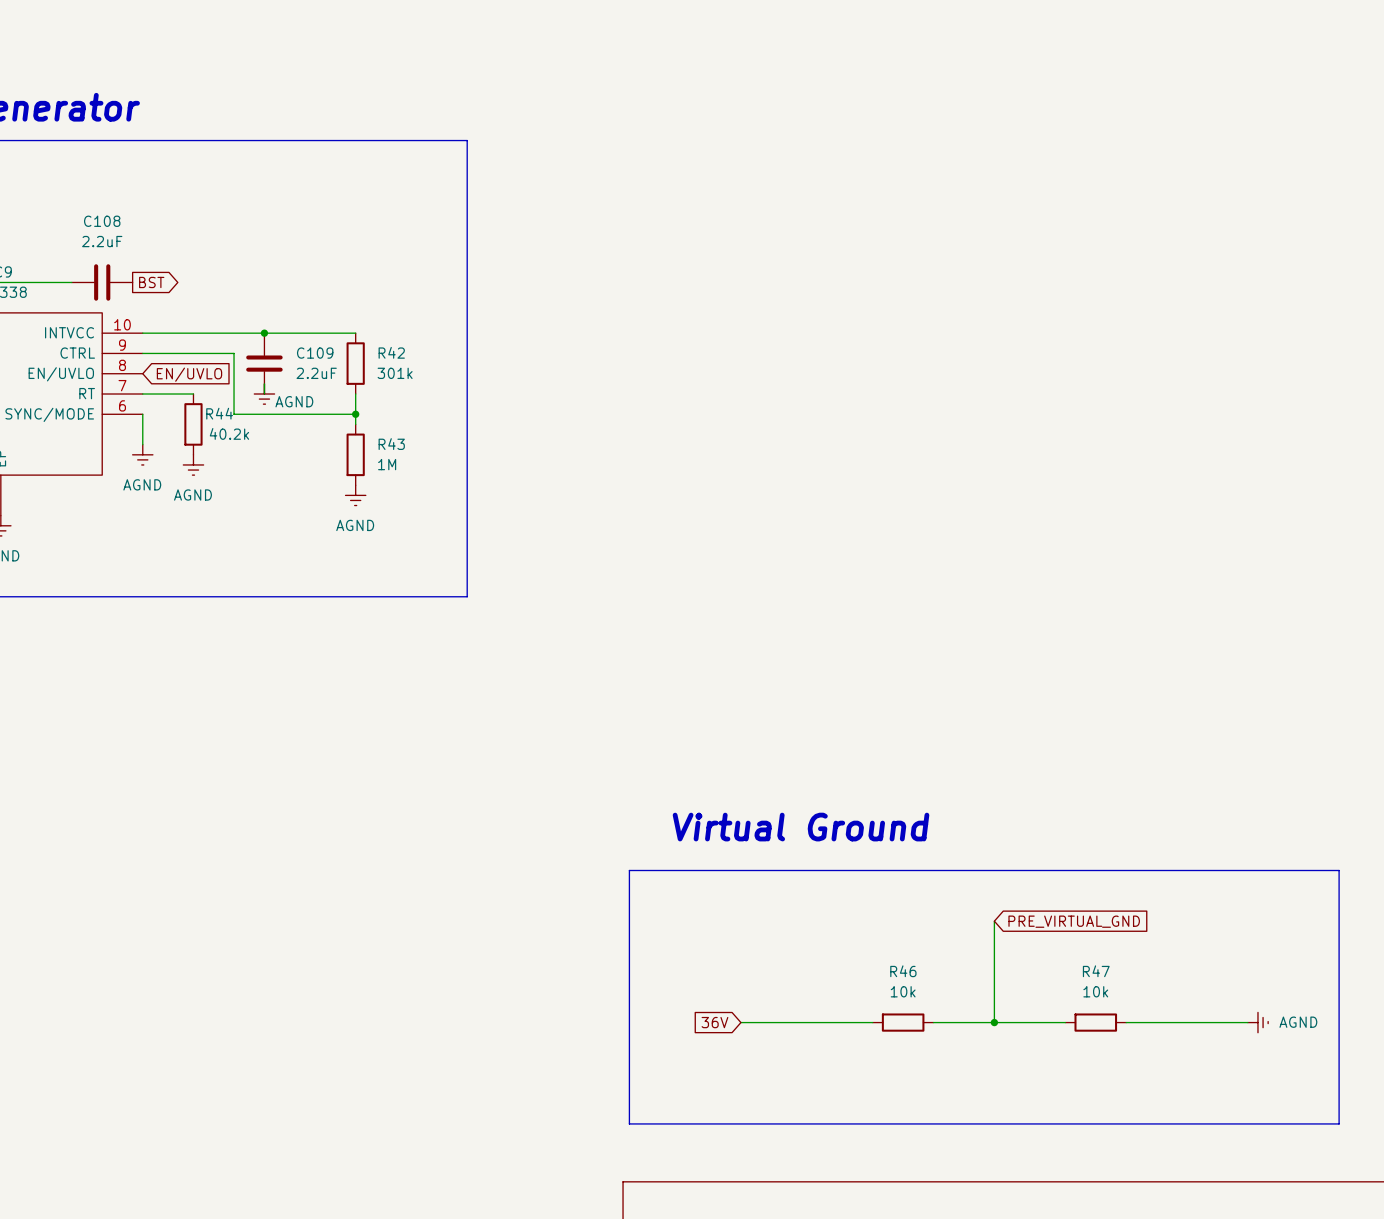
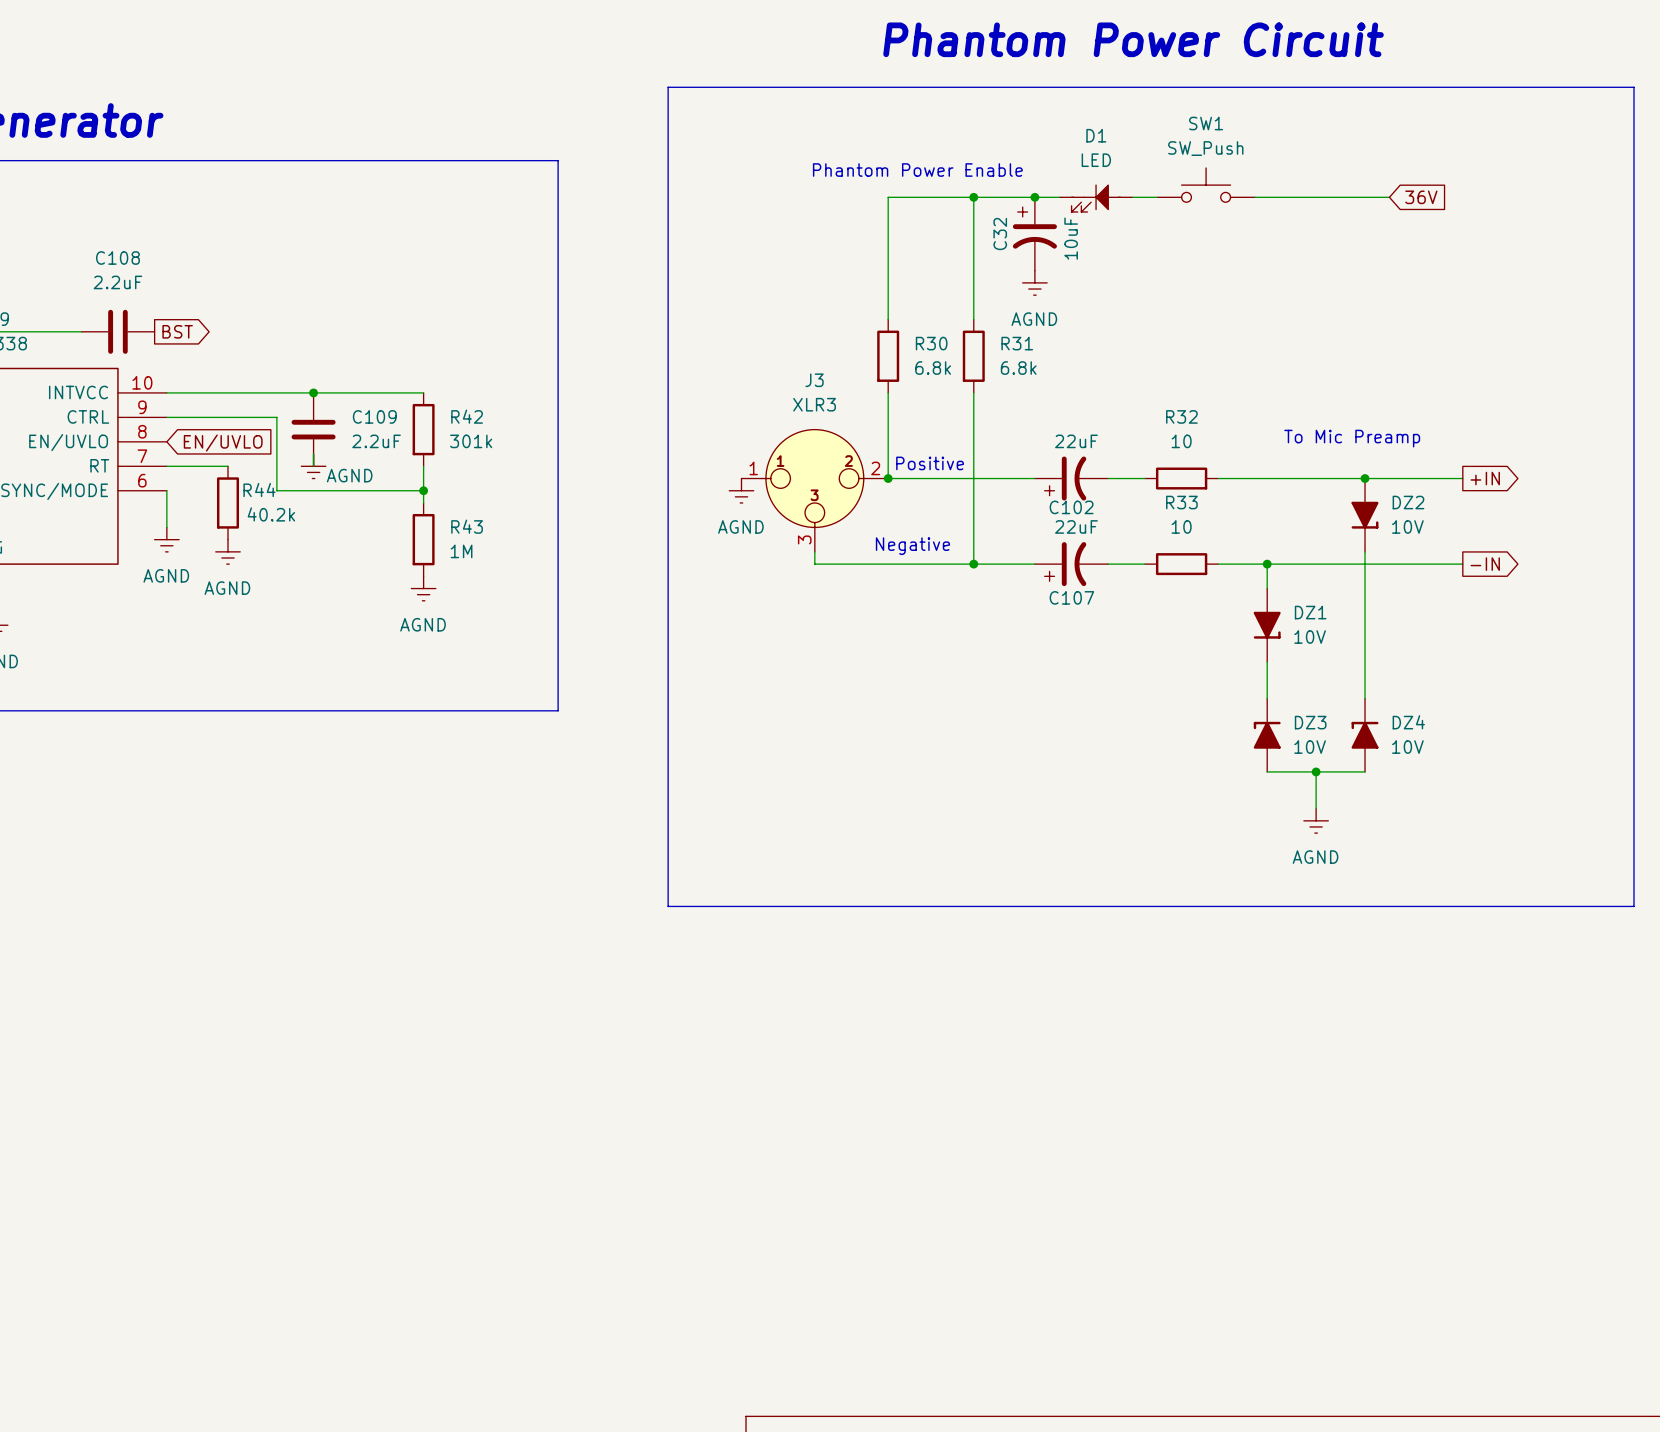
text: none -> Phantom Power Circuit (1133, 39)
line: none -> (668, 87) (1633, 87) (1633, 906) (668, 906) (668, 87)
text: none -> Phantom Power Enable (917, 170)
SW1: none -> SW_Push (1206, 185)
wire: none -> (973, 197) (973, 319)
junction: none -> (973, 197)
junction: none -> (1034, 197)
wire: none -> (1059, 197) (888, 197) (888, 319)
wire: none -> (1132, 197) (1157, 197)
wire: none -> (1254, 197) (1389, 197)
global label: none -> 36V (1421, 197)
D1: none -> LED (1096, 198)
C32: none -> 10uF (1034, 234)
power symbol: none -> AGND (1034, 282)
R30: none -> 6.8k (888, 356)
R31: none -> 6.8k (973, 356)
wire: none -> (888, 392) (888, 478) (1034, 478)
wire: none -> (973, 392) (973, 564)
text: none -> To Mic Preamp (1352, 438)
text: none -> Positive (930, 463)
junction: none -> (888, 478)
C102: none -> 22uF (1071, 478)
wire: none -> (1108, 478) (1144, 478)
R32: none -> 10 (1181, 478)
wire: none -> (1218, 478) (1462, 478)
junction: none -> (1365, 478)
global label: none -> +IN (1485, 478)
power symbol: none -> AGND (741, 490)
J3: none -> XLR3 (814, 490)
DZ2: none -> 10V (1365, 515)
text: none -> Negative (912, 546)
wire: none -> (814, 551) (814, 564) (1034, 564)
wire: none -> (1365, 551) (1365, 698)
junction: none -> (973, 564)
C107: none -> 22uF (1071, 564)
wire: none -> (1108, 564) (1144, 564)
R33: none -> 10 (1181, 564)
wire: none -> (1218, 564) (1462, 564)
wire: none -> (1267, 564) (1267, 588)
junction: none -> (1267, 564)
global label: none -> -IN (1485, 564)
DZ1: none -> 10V (1267, 625)
wire: none -> (1267, 661) (1267, 698)
DZ3: none -> 10V (1267, 735)
DZ4: none -> 10V (1365, 735)
wire: none -> (1267, 771) (1365, 771)
wire: none -> (1316, 771) (1316, 808)
junction: none -> (1316, 771)
power symbol: none -> AGND (1316, 820)
text: Virtual Ground (801, 827) -> none
line: (629, 870) (1339, 870) (1339, 1123) (629, 1123) (629, 870) -> none
wire: (994, 921) (994, 1022) -> none
global label: PRE_VIRTUAL_GND (1074, 921) -> none
global label: 36V (714, 1022) -> none
wire: (740, 1022) (872, 1022) -> none
R46: 10k (903, 1022) -> none
wire: (933, 1022) (1065, 1022) -> none
junction: (994, 1022) -> none
R47: 10k (1095, 1022) -> none
wire: (1126, 1022) (1247, 1022) -> none
power symbol: AGND (1257, 1022) -> none

